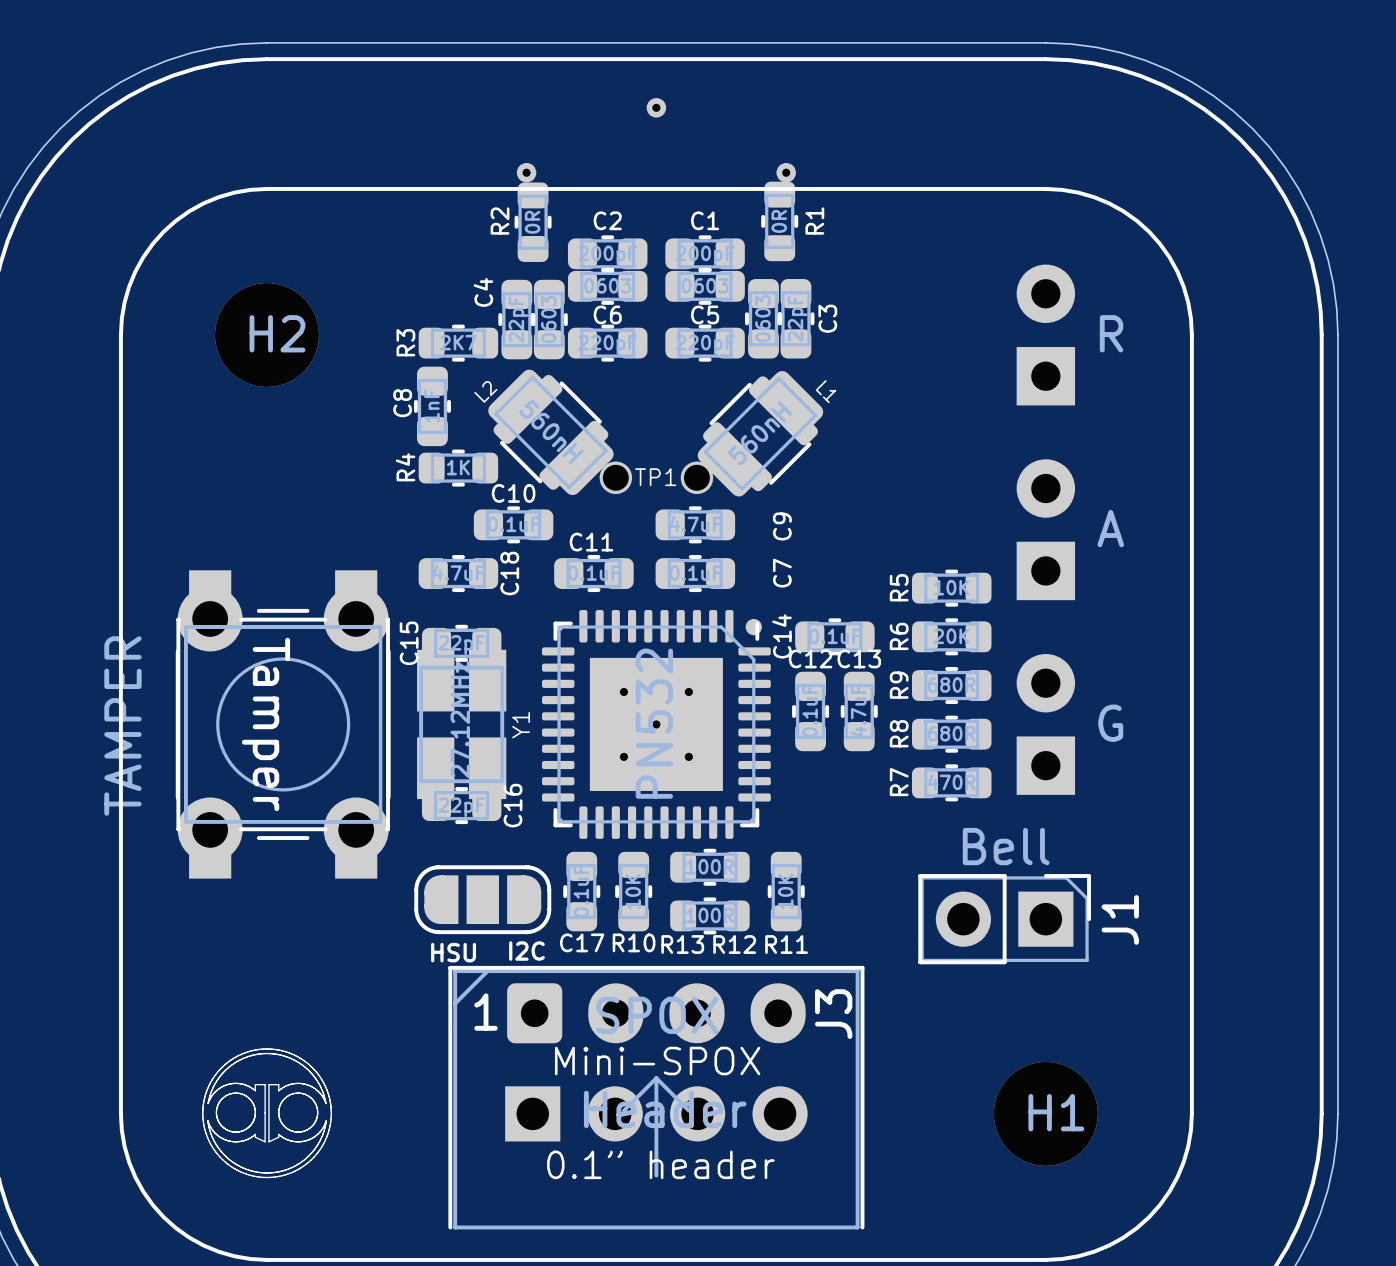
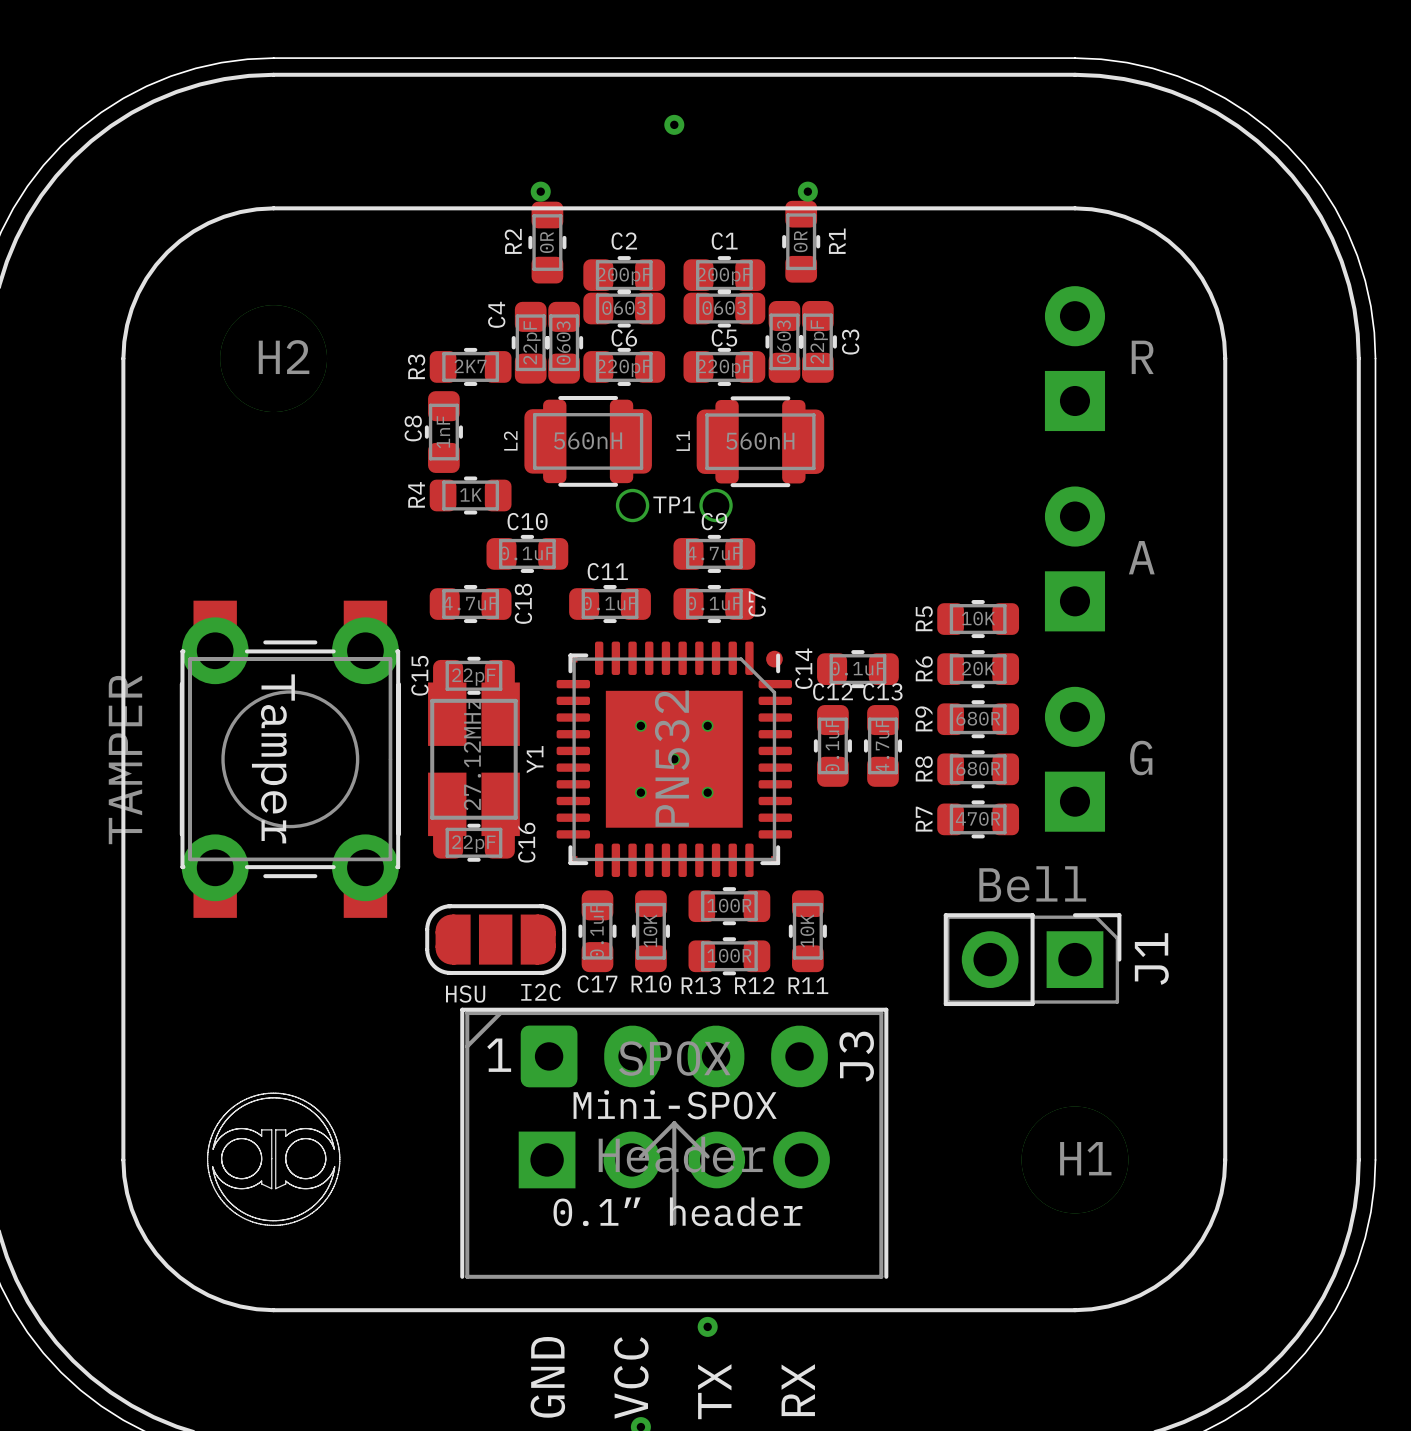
L1 name position: L1 (826, 391) -> L1 (683, 441)
L2 rotation: 0° (550, 432) -> 45° counterclockwise (588, 441)
L1 rotation: 0° (760, 433) -> 45° clockwise (760, 441)
C9 name rotation: 0° (782, 526) -> 90° clockwise (714, 521)
C9 name position: C9 (782, 526) -> C9 (714, 521)
C7 name position: C7 (782, 573) -> C7 (757, 604)

